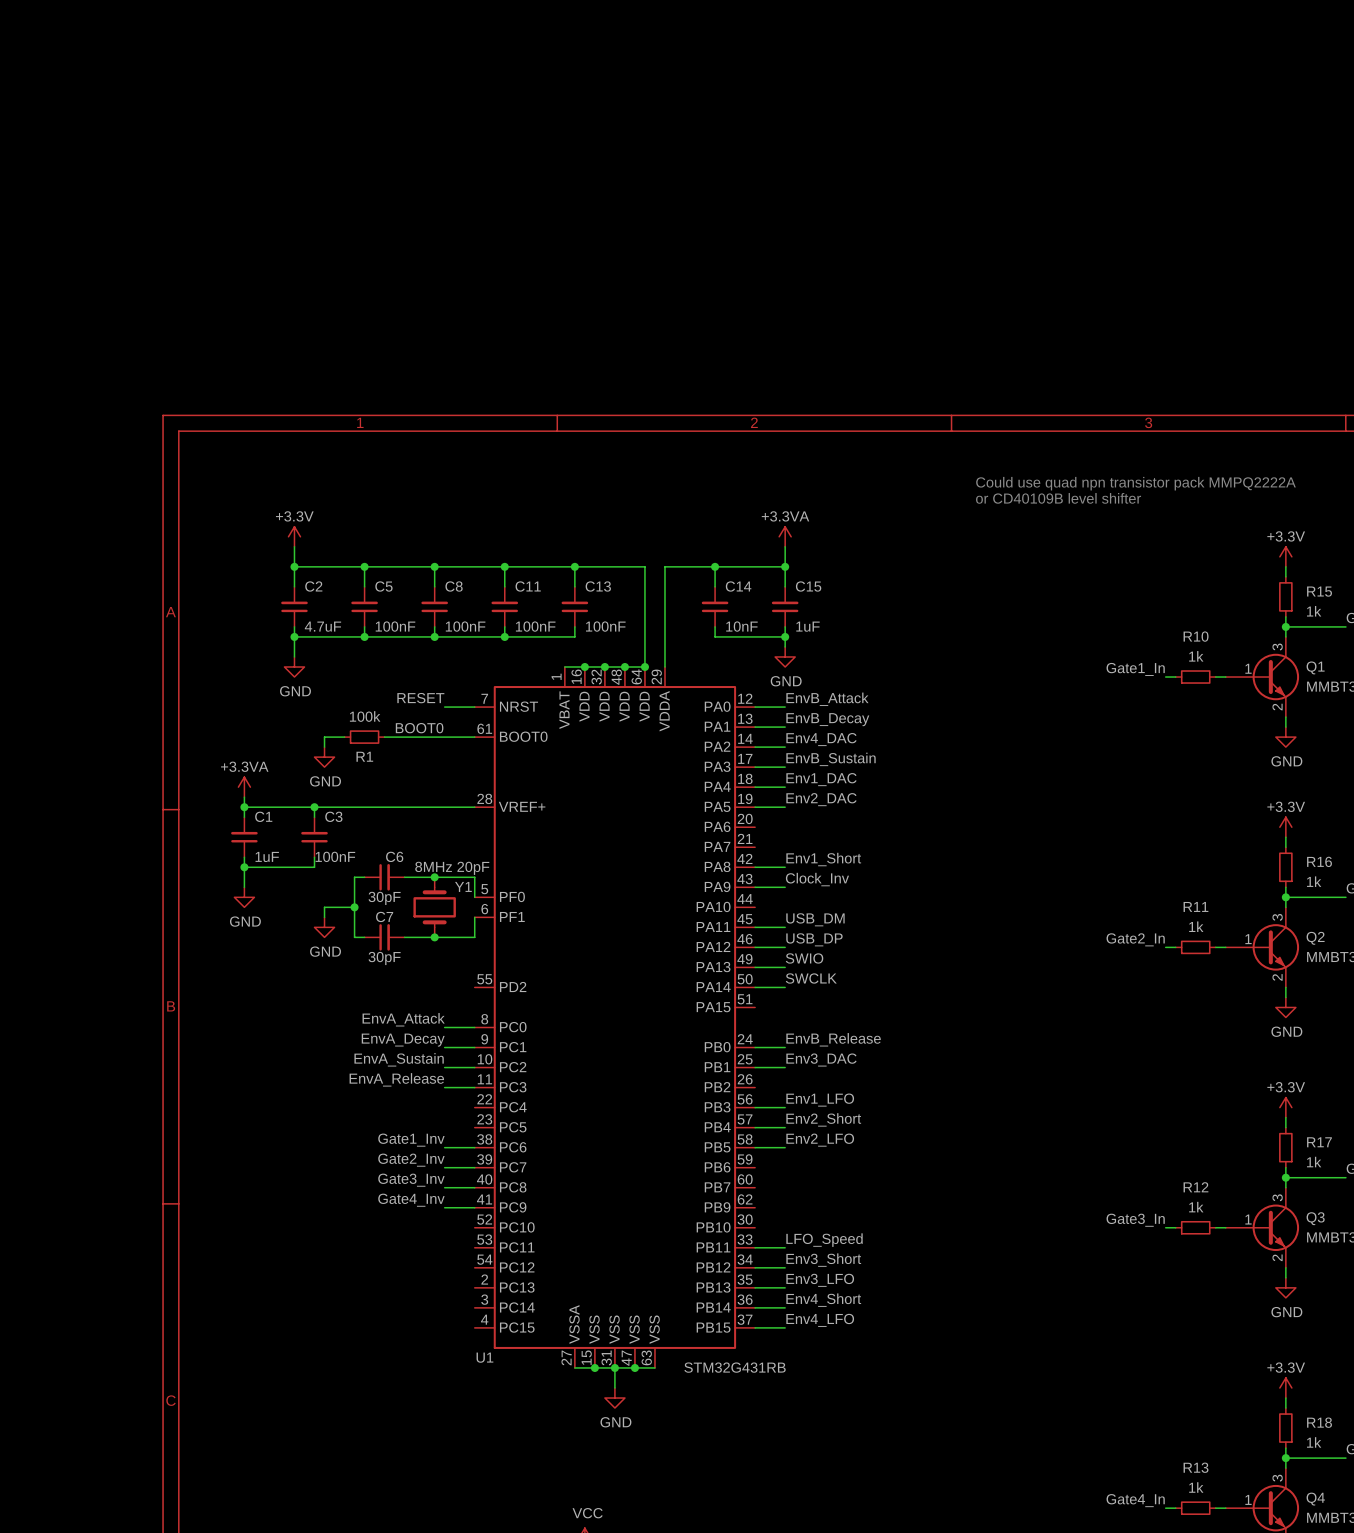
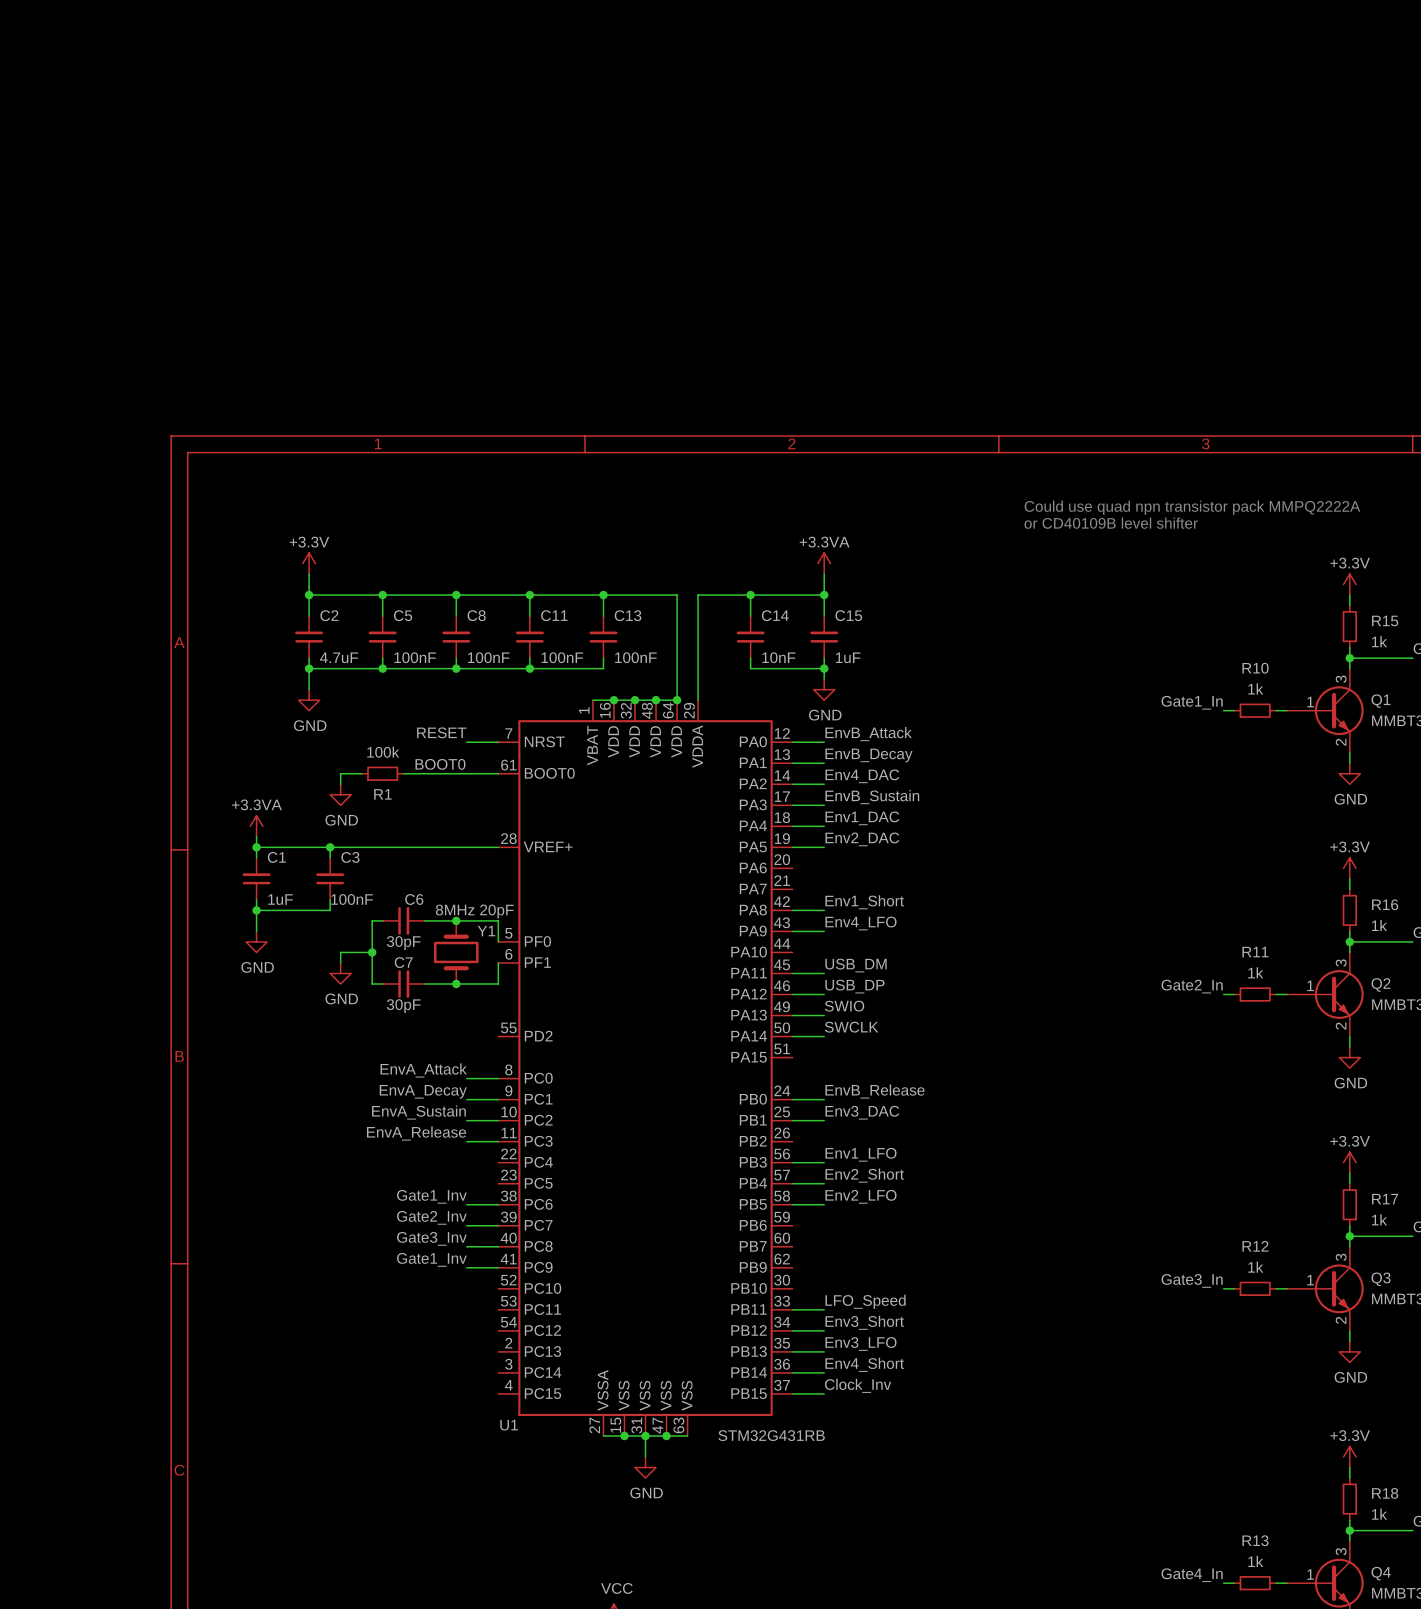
label: Clock_Inv (817, 879) -> Env4_LFO (860, 923)
label: Gate4_Inv (411, 1200) -> Gate1_Inv (431, 1259)
label: Env4_LFO (820, 1320) -> Clock_Inv (858, 1385)

